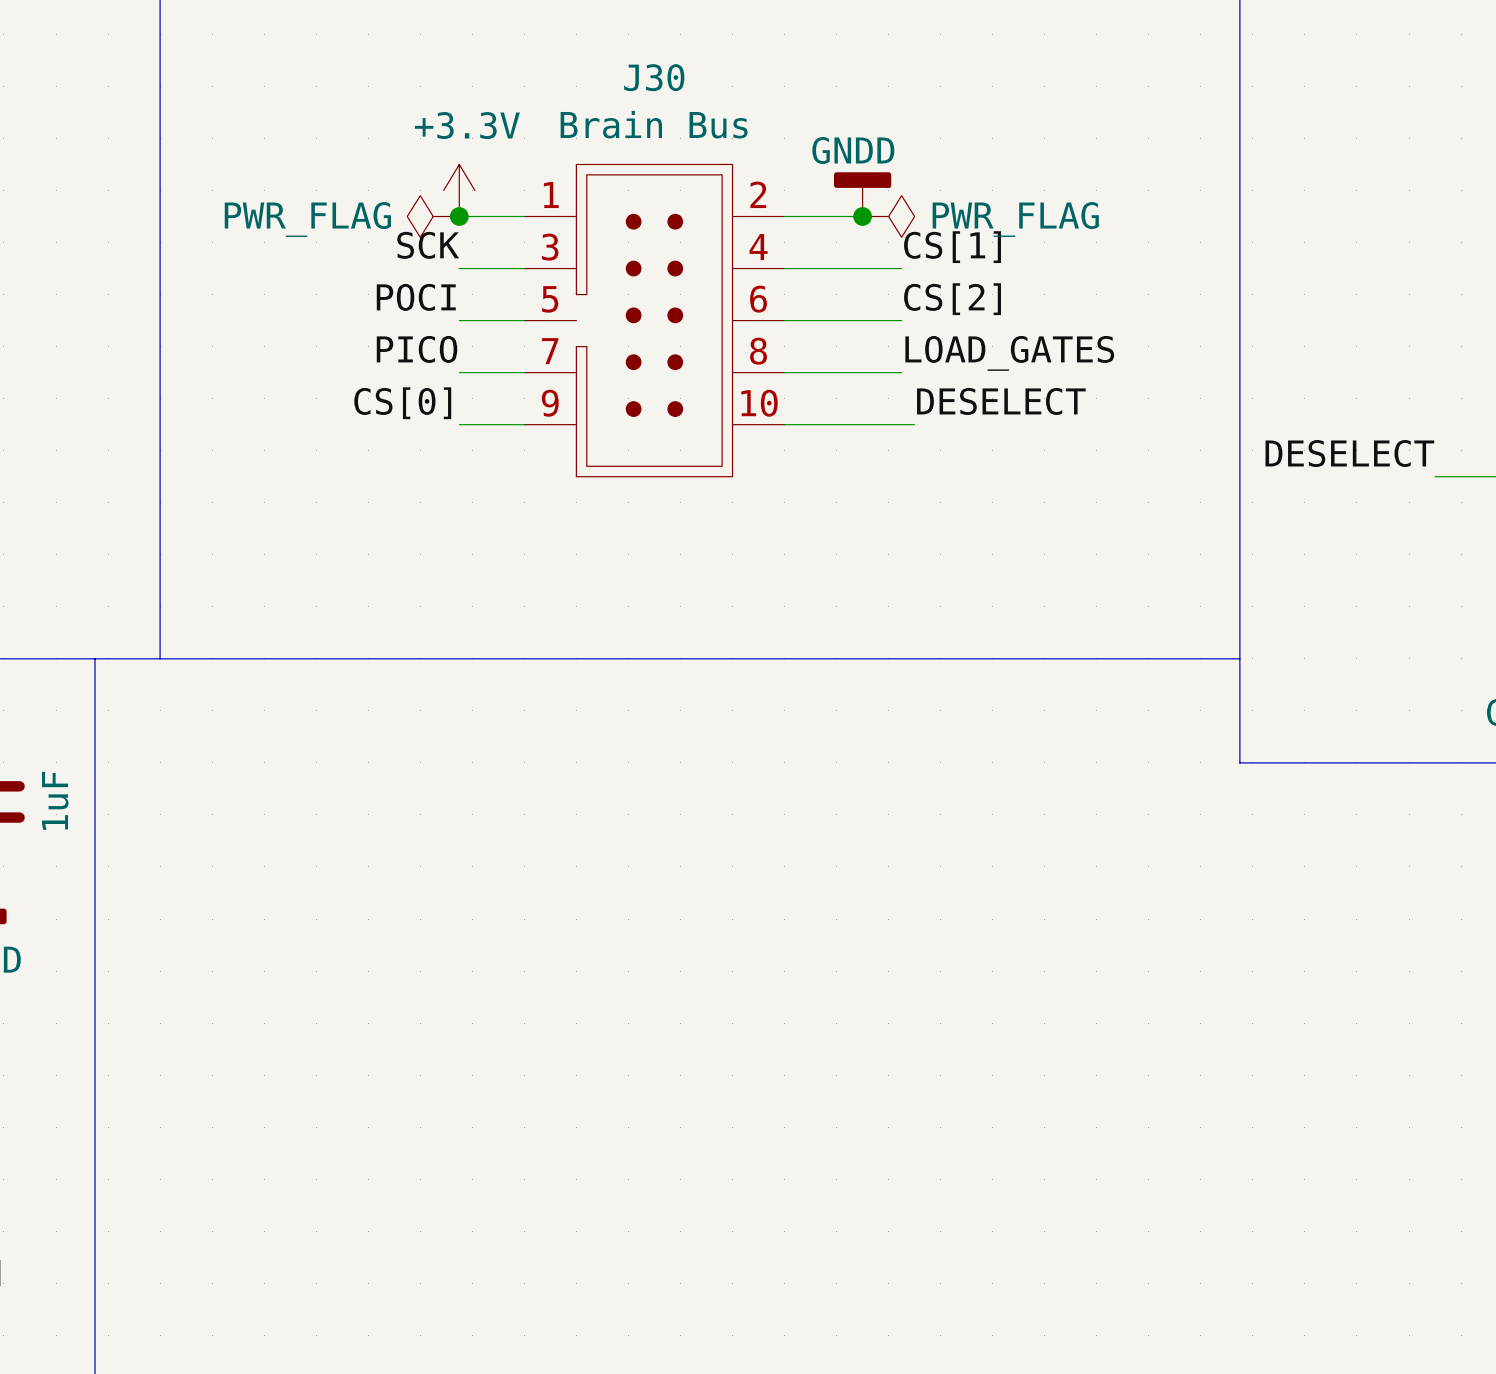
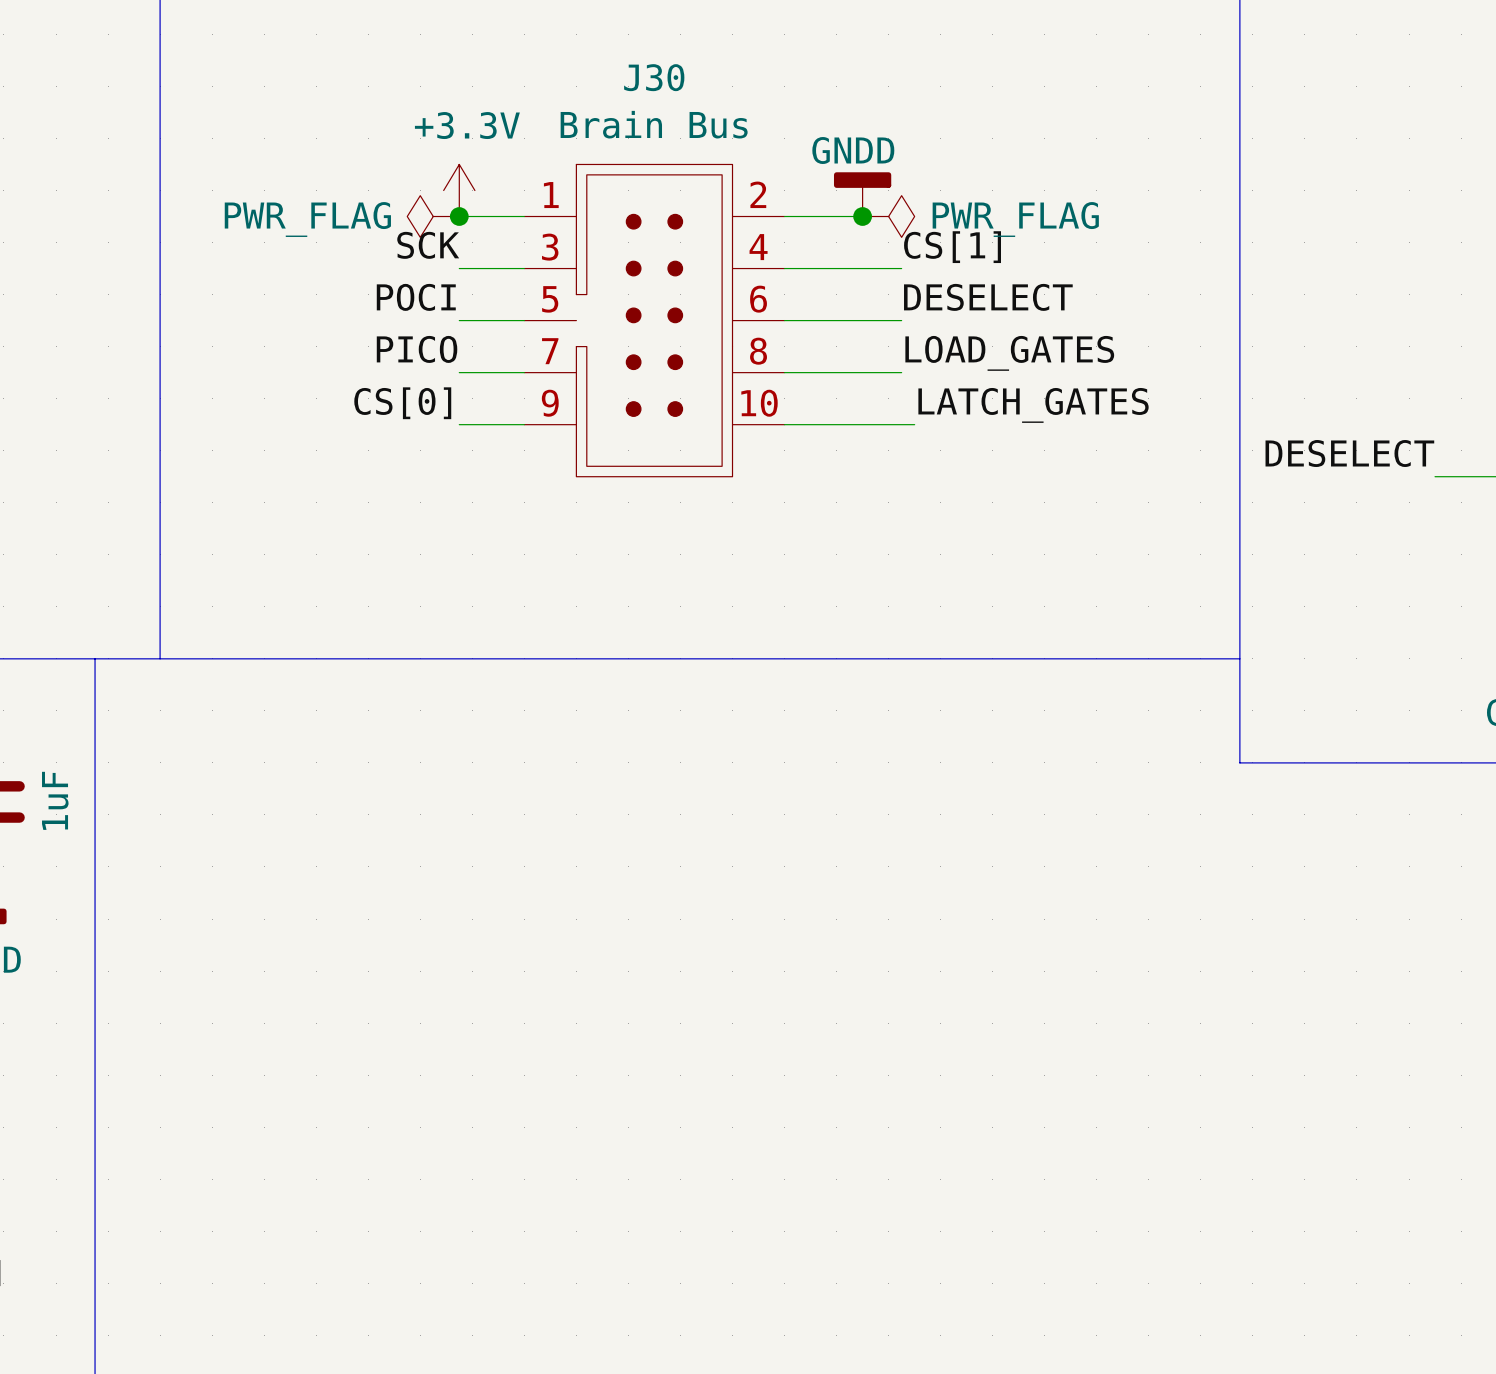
label: CS[2] (952, 299) -> DESELECT (988, 297)
label: DESELECT (1001, 401) -> LATCH_GATES (1033, 405)

